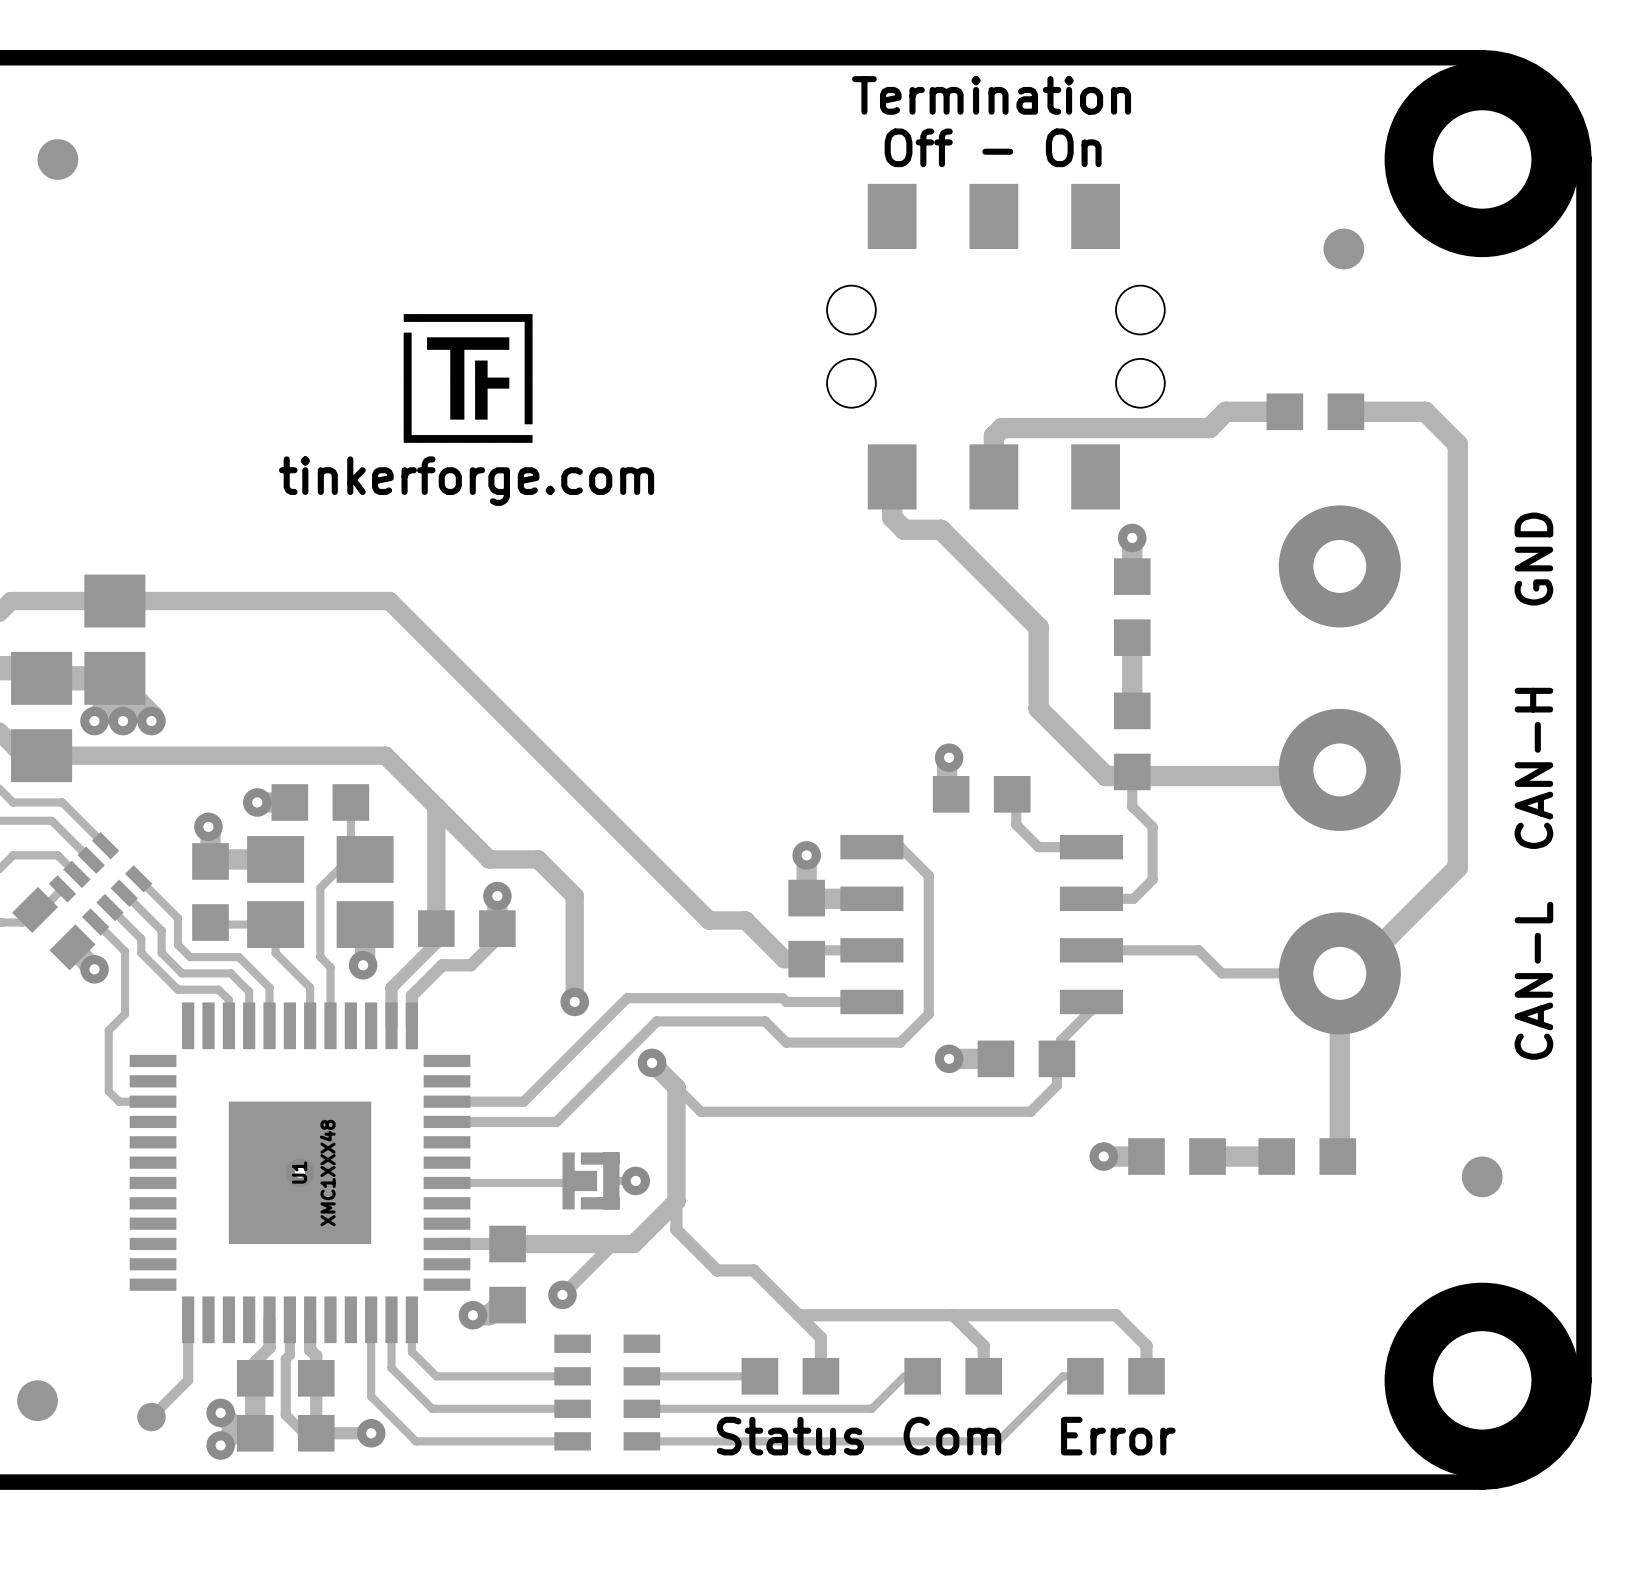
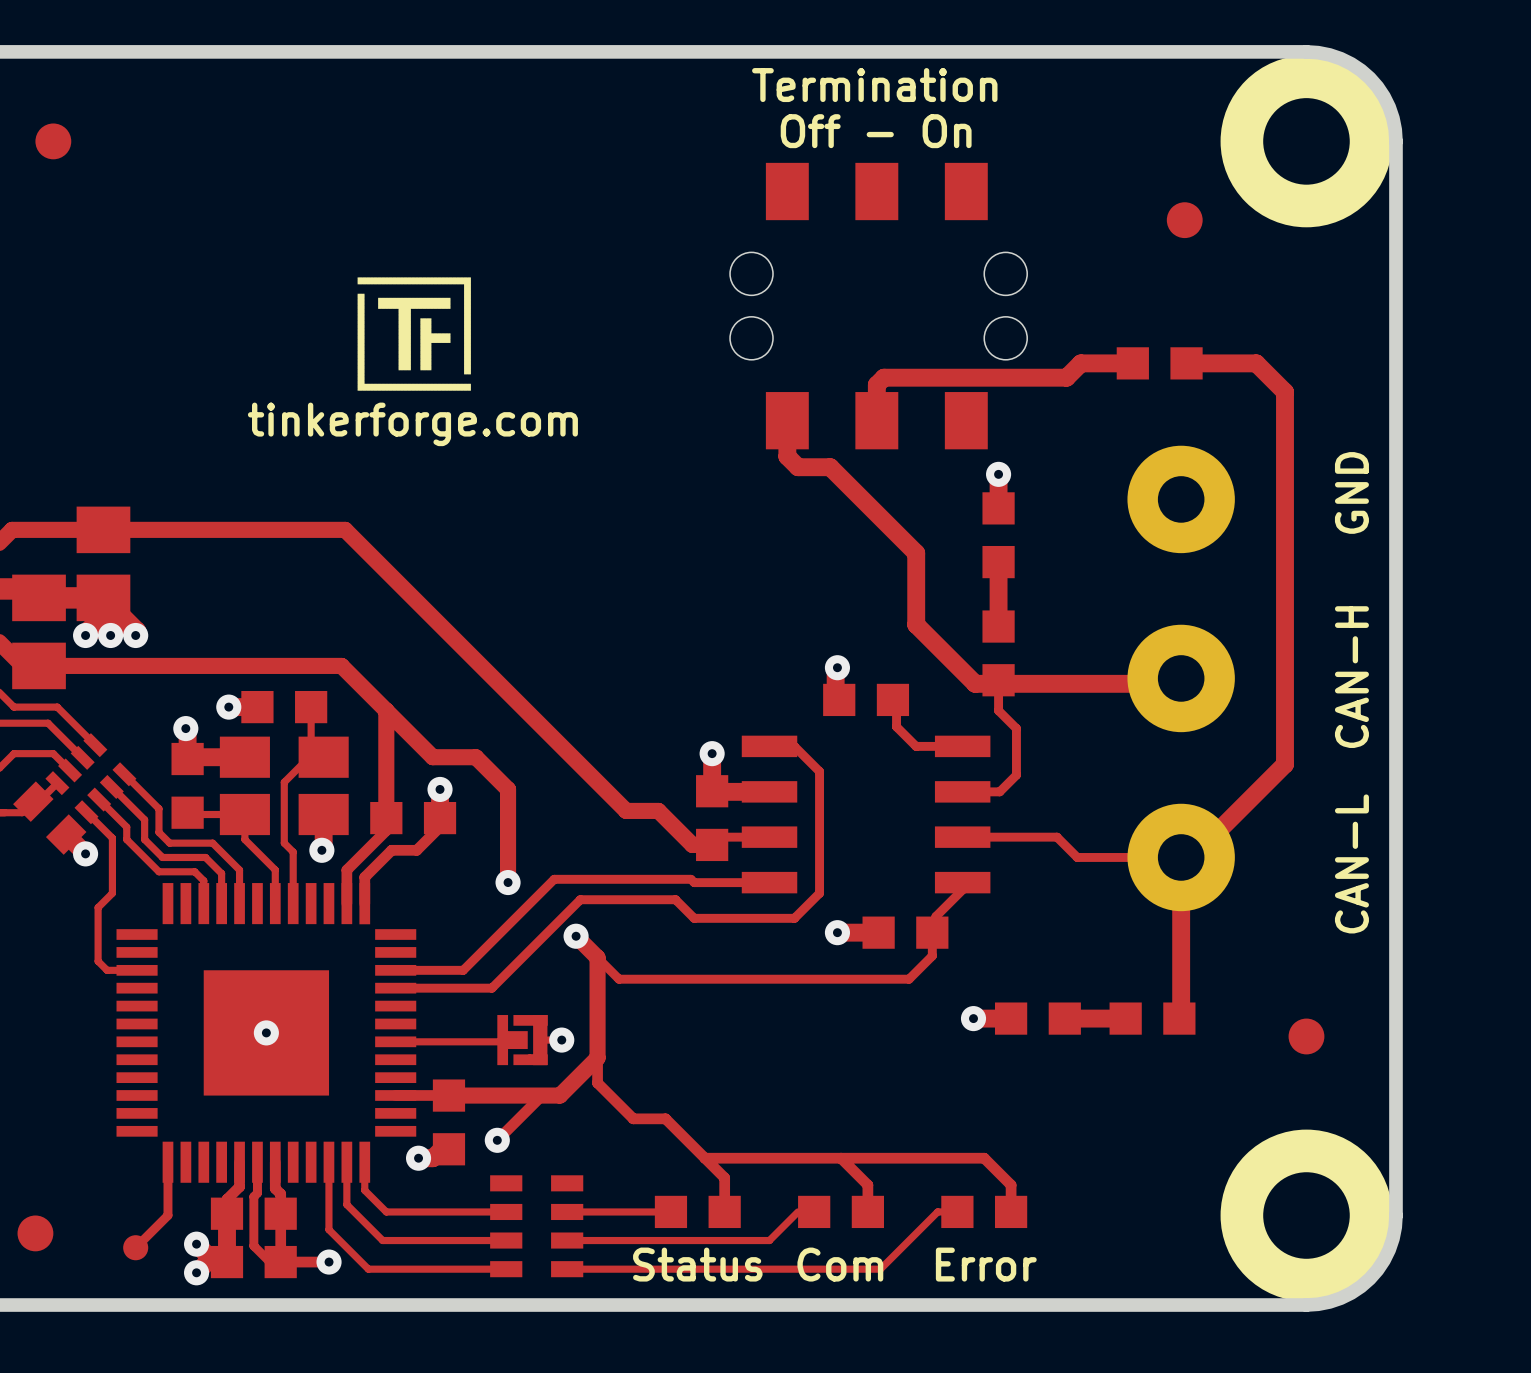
U1 name: U1 (299, 1172) -> none
U1 value: XMC1XXX48 (327, 1173) -> none

